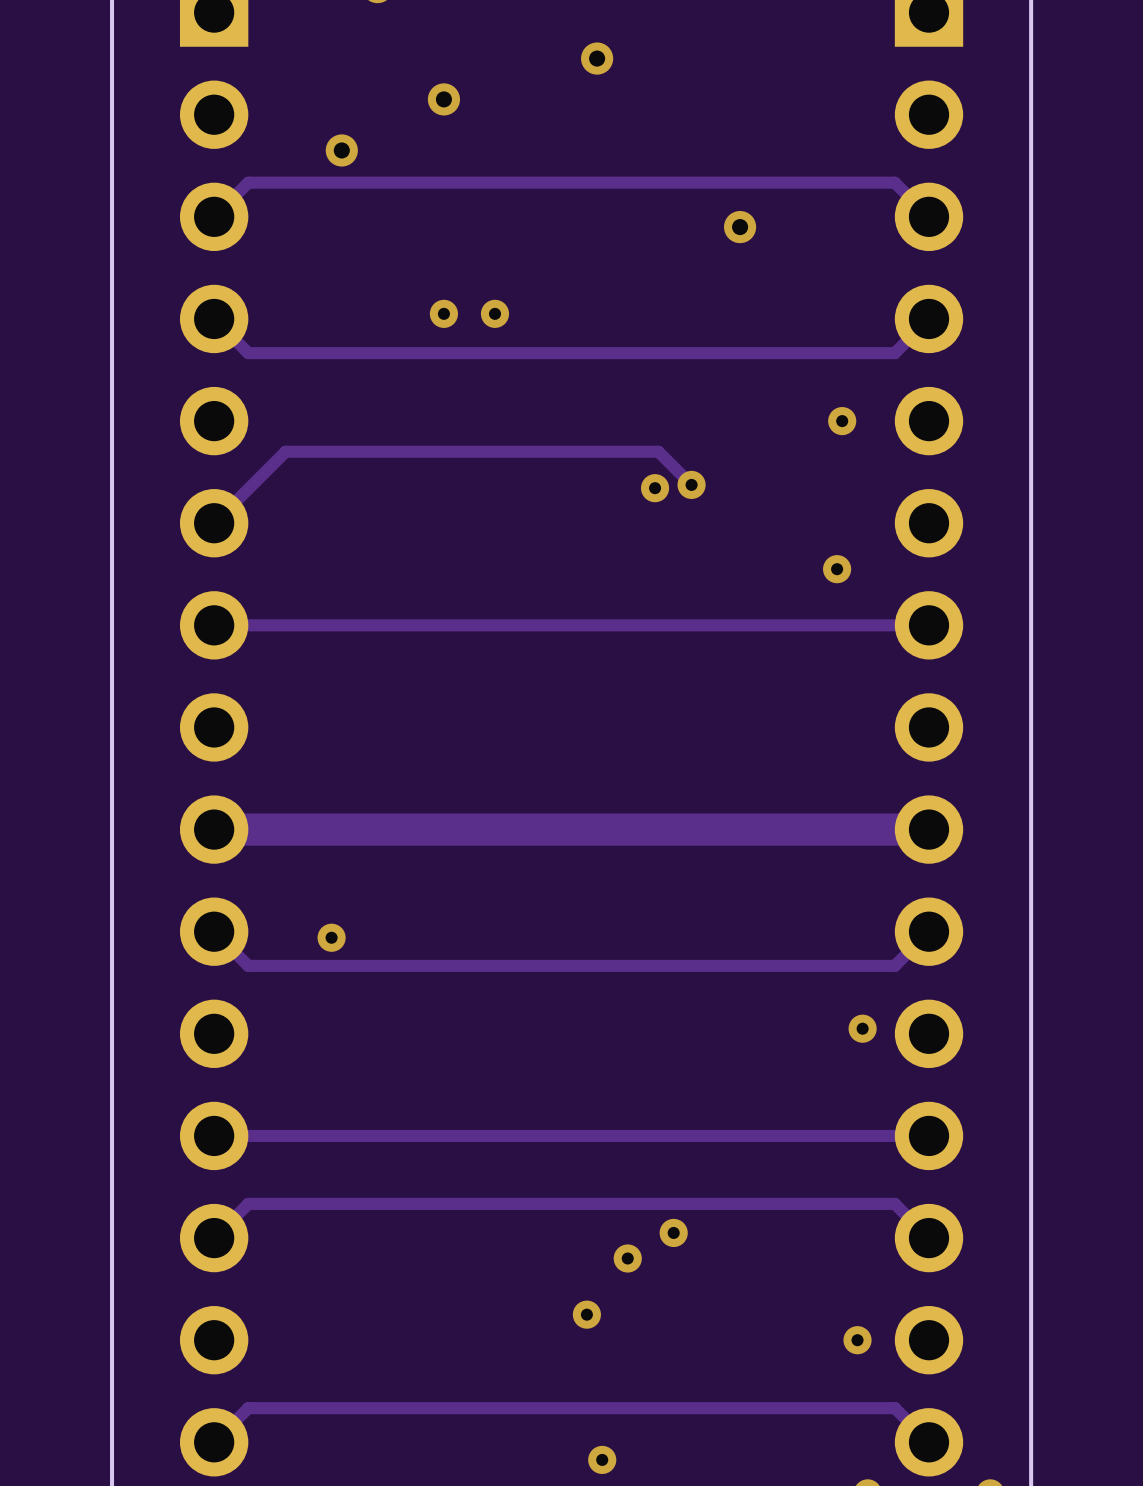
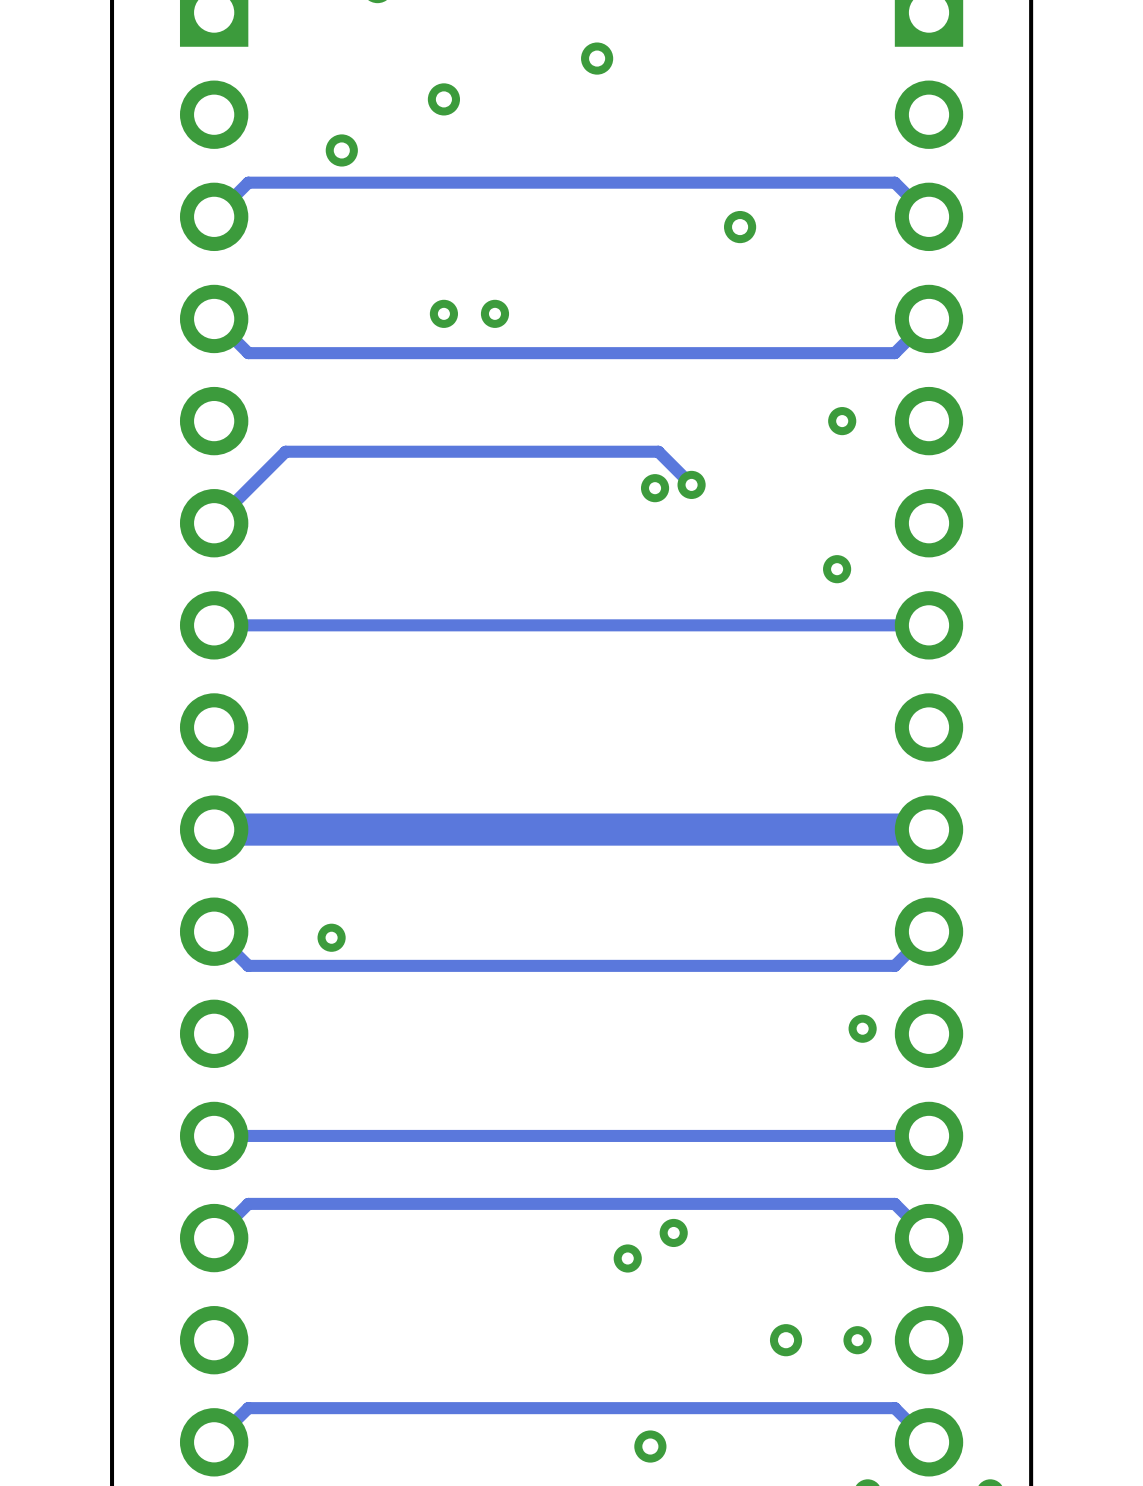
via: (586, 1314) -> none
via: none -> (786, 1340)
via: none -> (650, 1446)
via: (602, 1459) -> none

